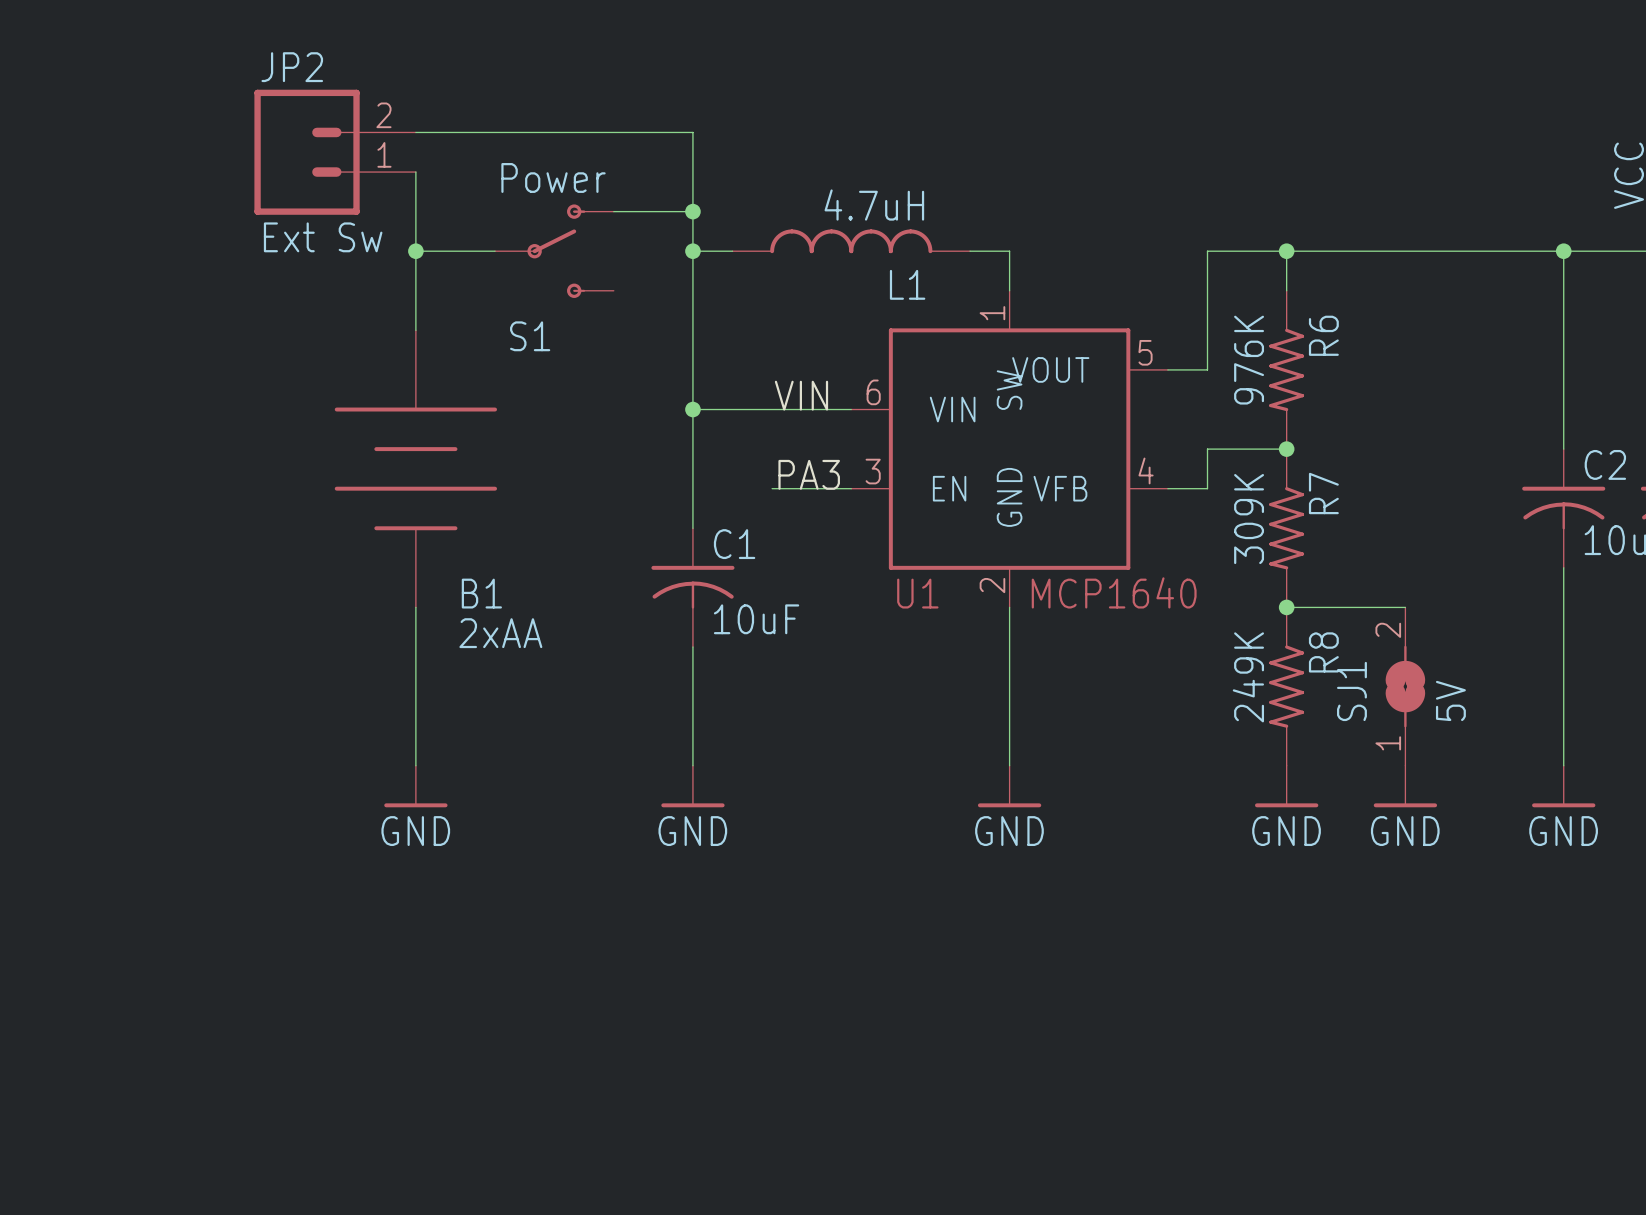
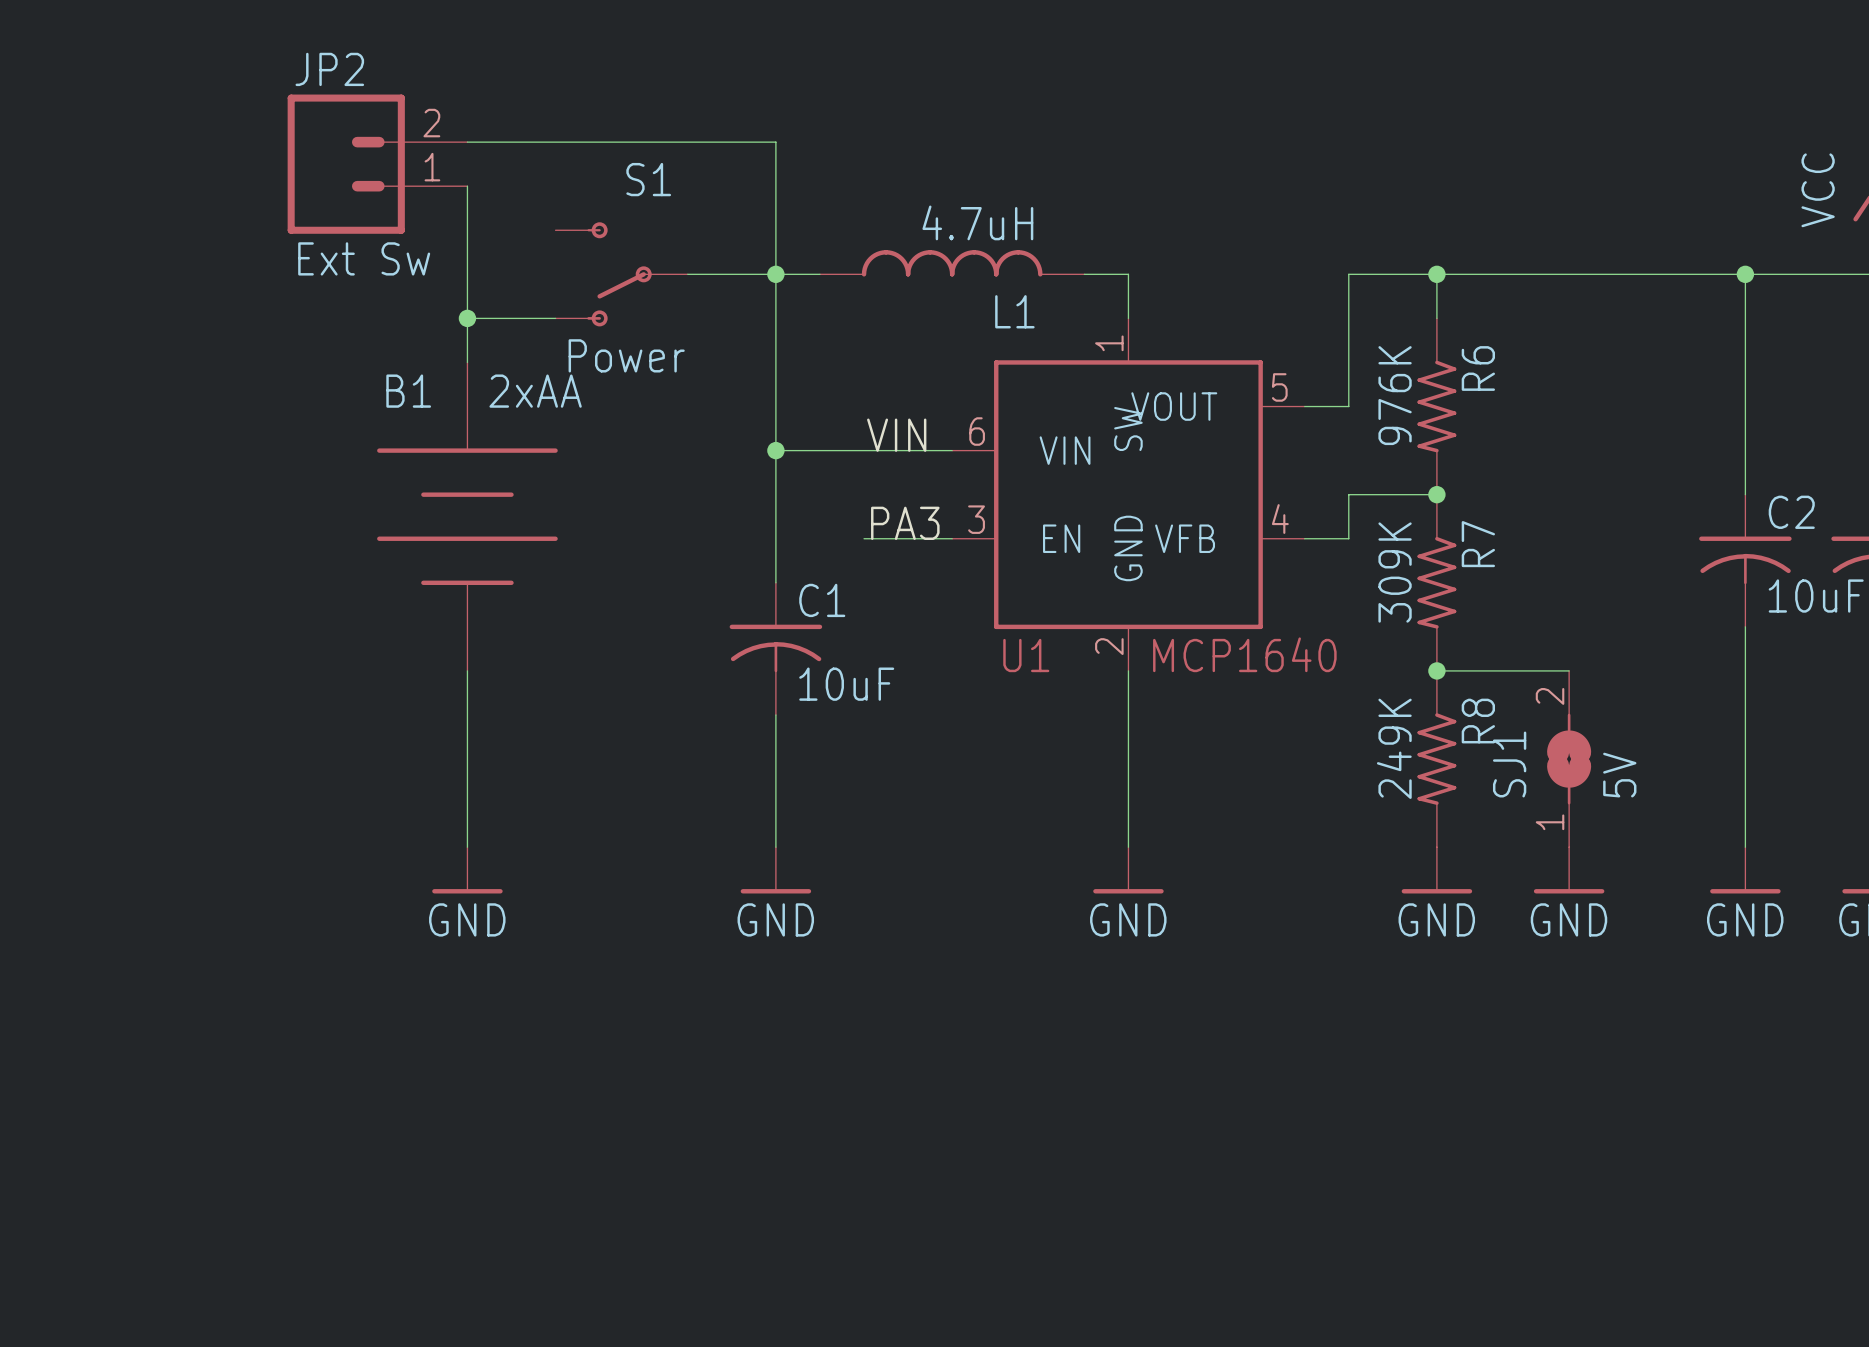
wire: (613, 211) (692, 211) -> (687, 274) (775, 274)
junction: (692, 211) -> none
wire: (415, 251) (495, 251) -> (467, 318) (555, 318)
junction position: (415, 251) -> (467, 318)
S1 rotation: 0° (556, 251) -> 180° (619, 274)
B1 name position: B1 (481, 593) -> B1 (408, 391)
B1 value position: 2xAA (500, 633) -> 2xAA (535, 391)

